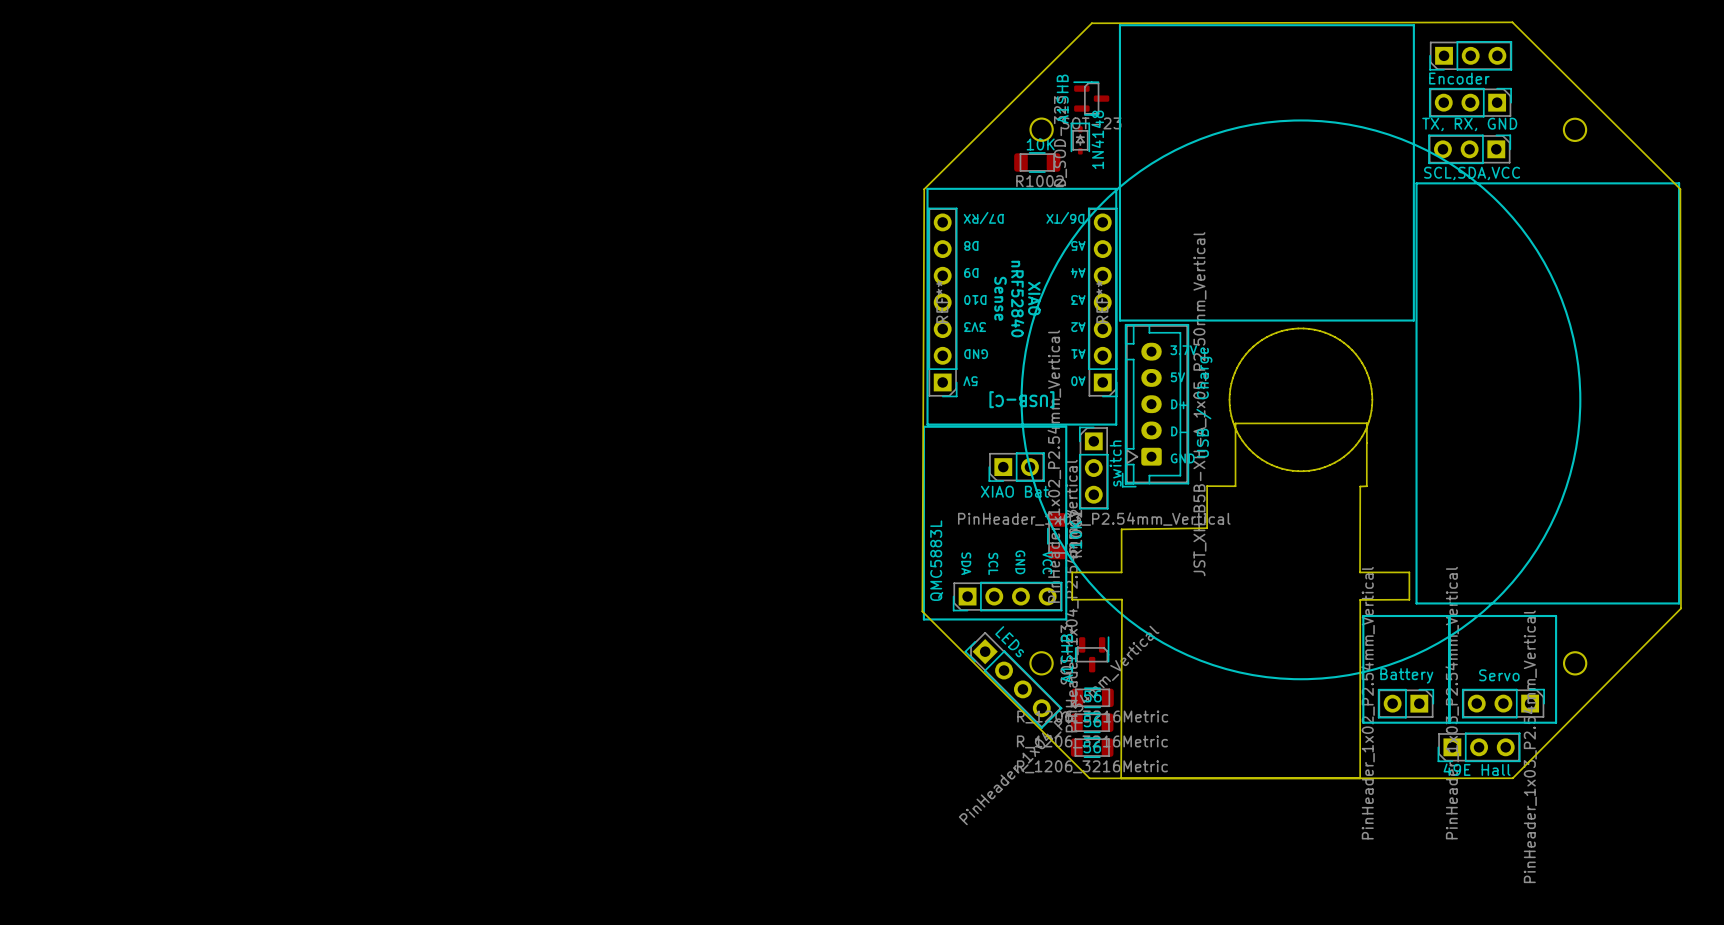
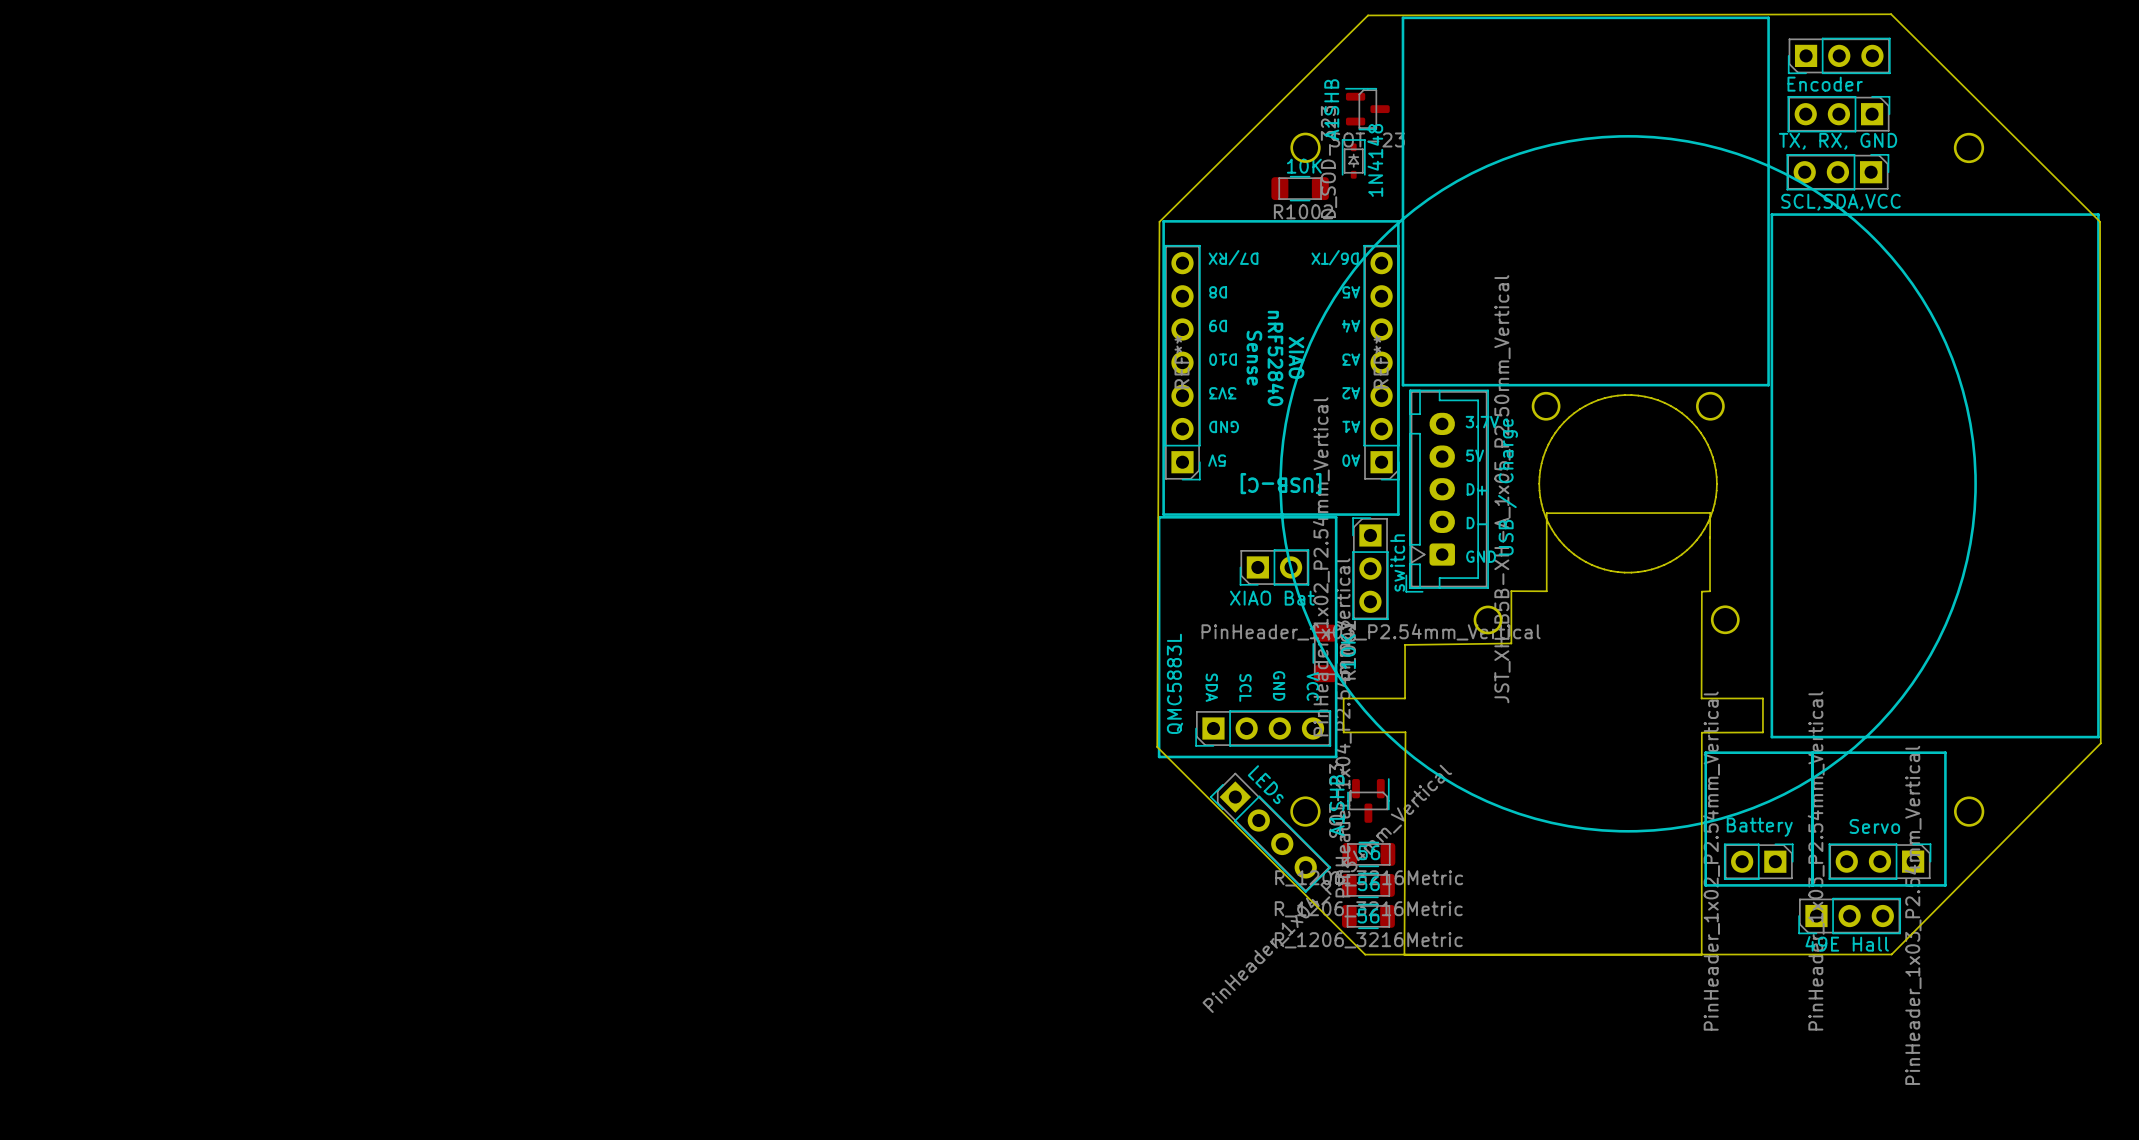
round board edge: none -> [1531, 391, 1561, 421]
round board edge: none -> [1696, 391, 1725, 421]
round board edge: none -> [1473, 605, 1503, 635]
round board edge: none -> [1710, 605, 1740, 635]

